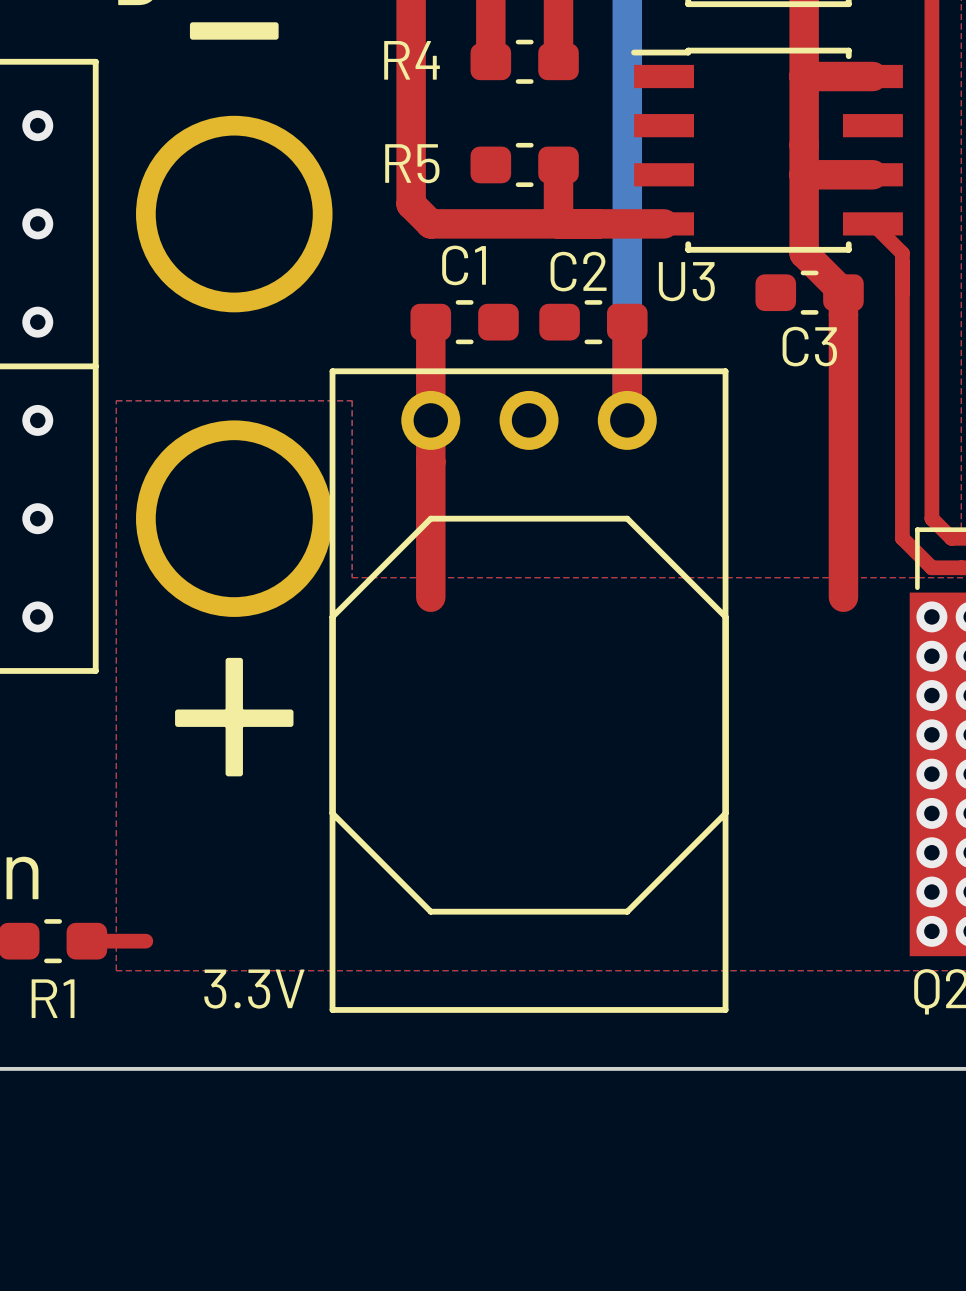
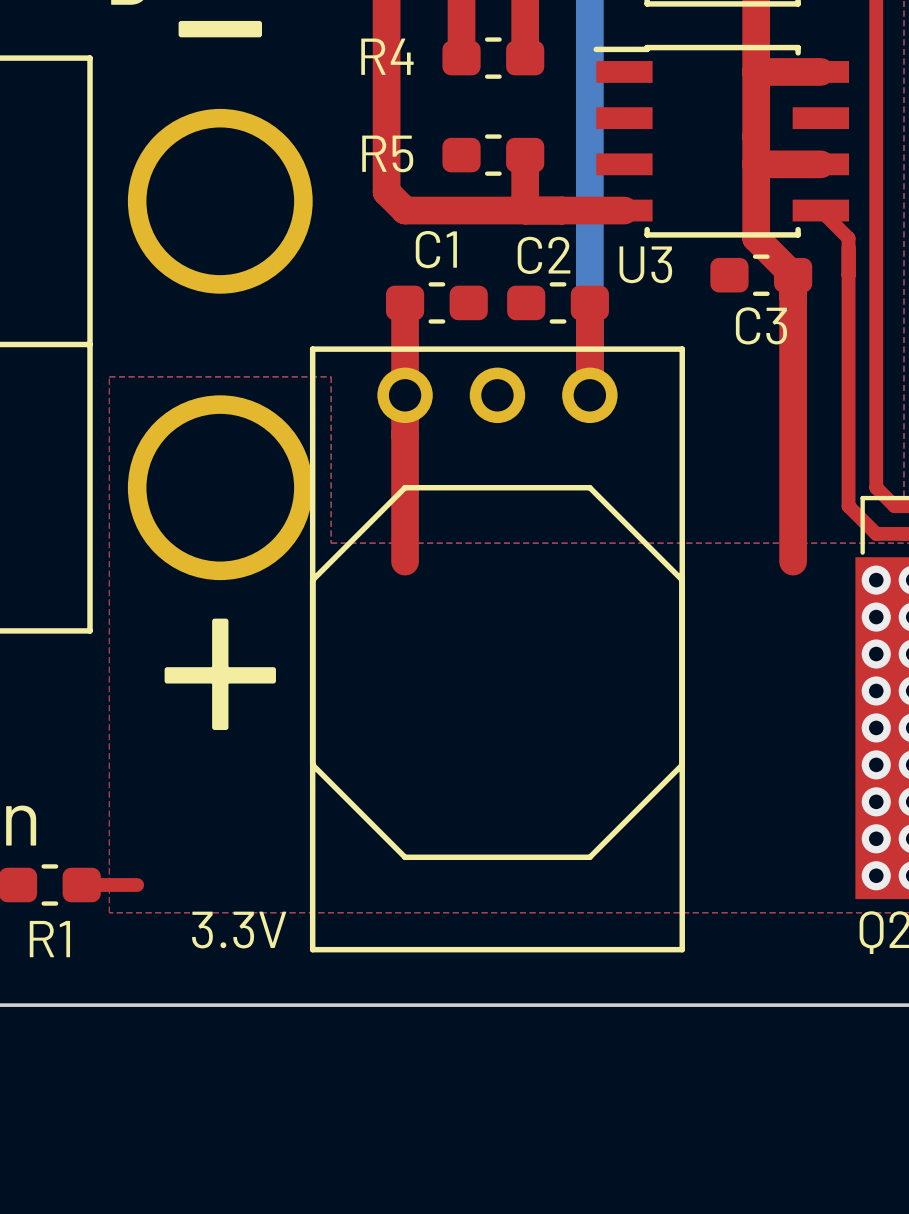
via: (37, 125) -> none
via: (37, 223) -> none
via: (37, 322) -> none
via: (37, 420) -> none
via: (37, 518) -> none
via: (37, 616) -> none

